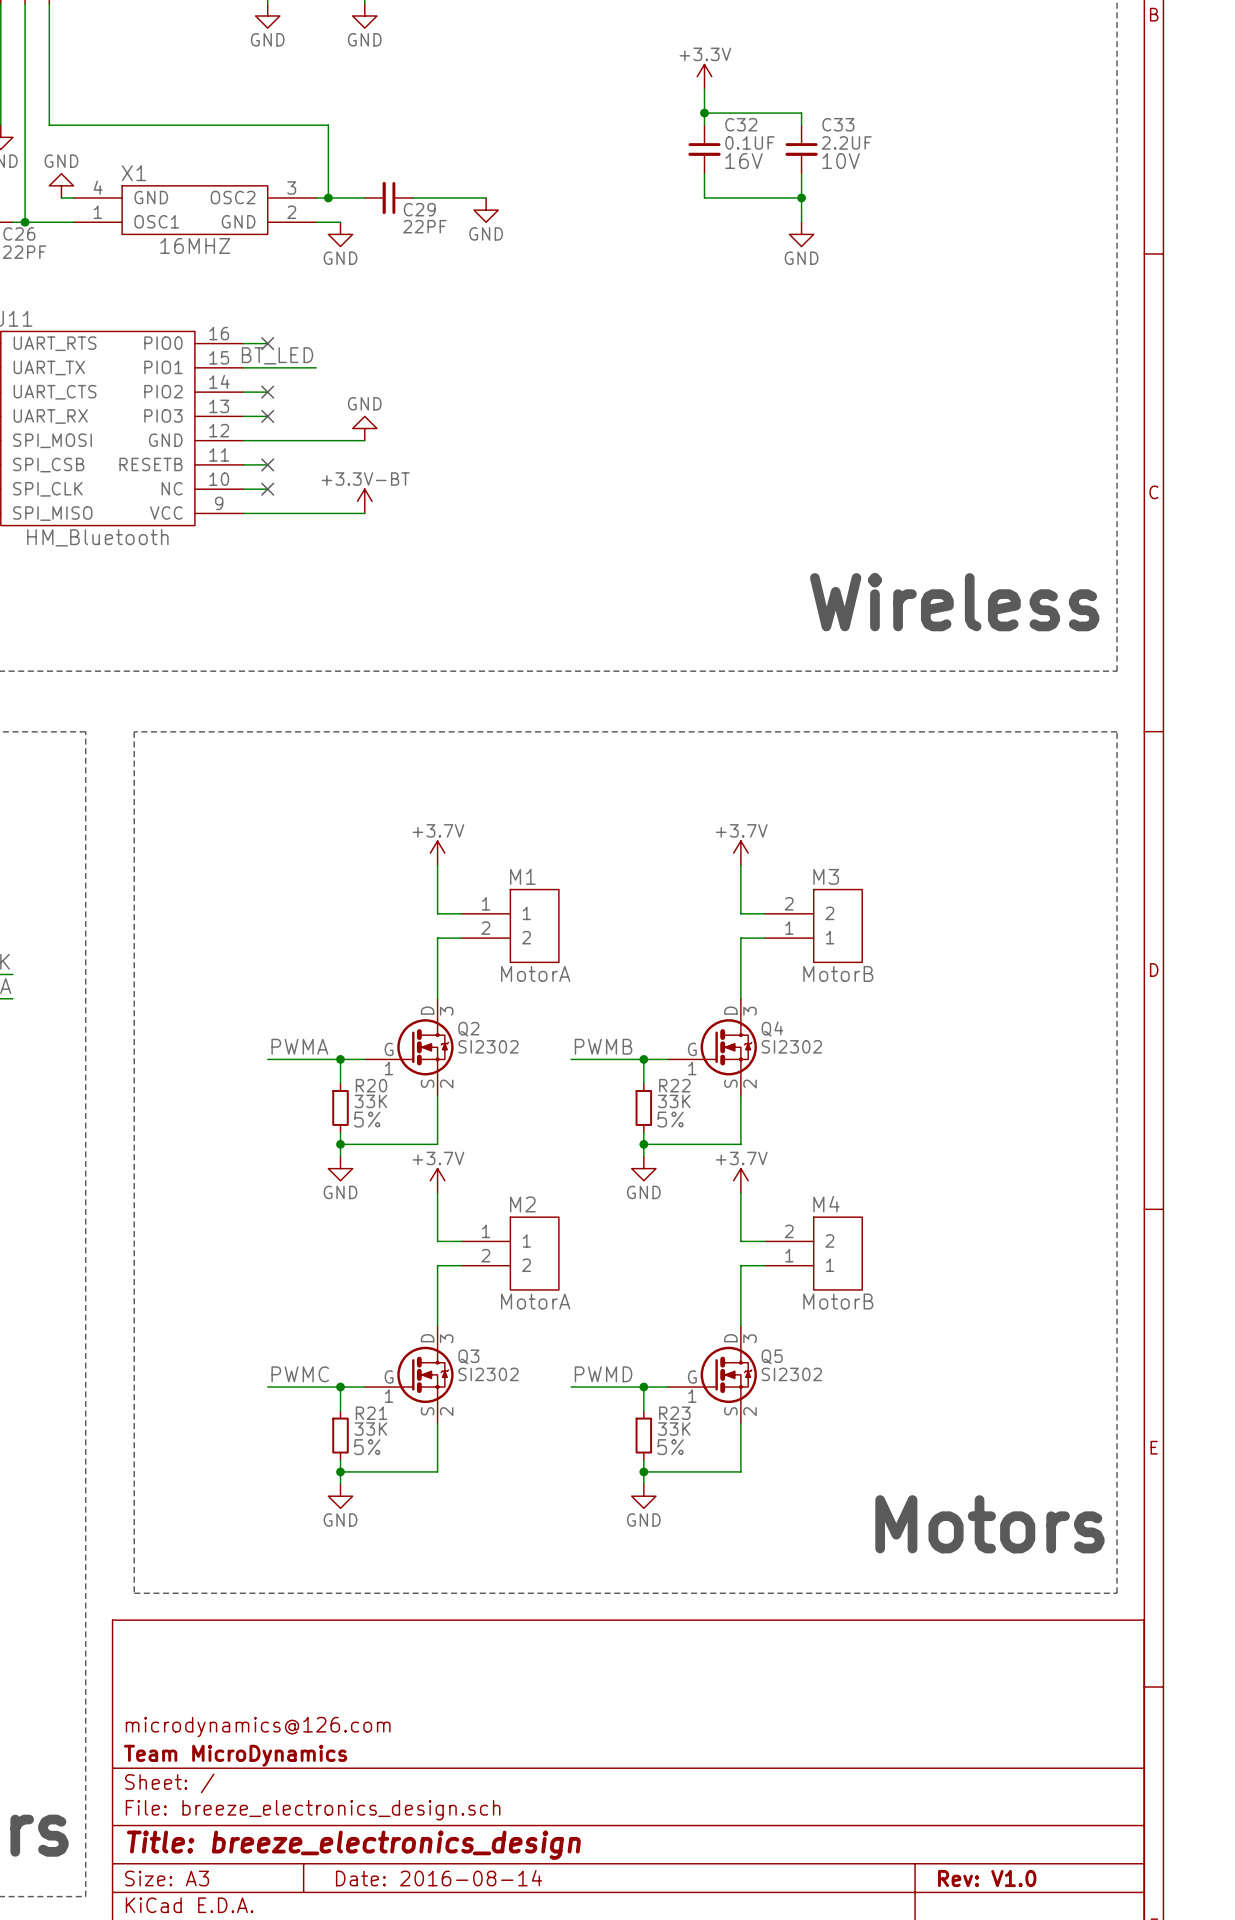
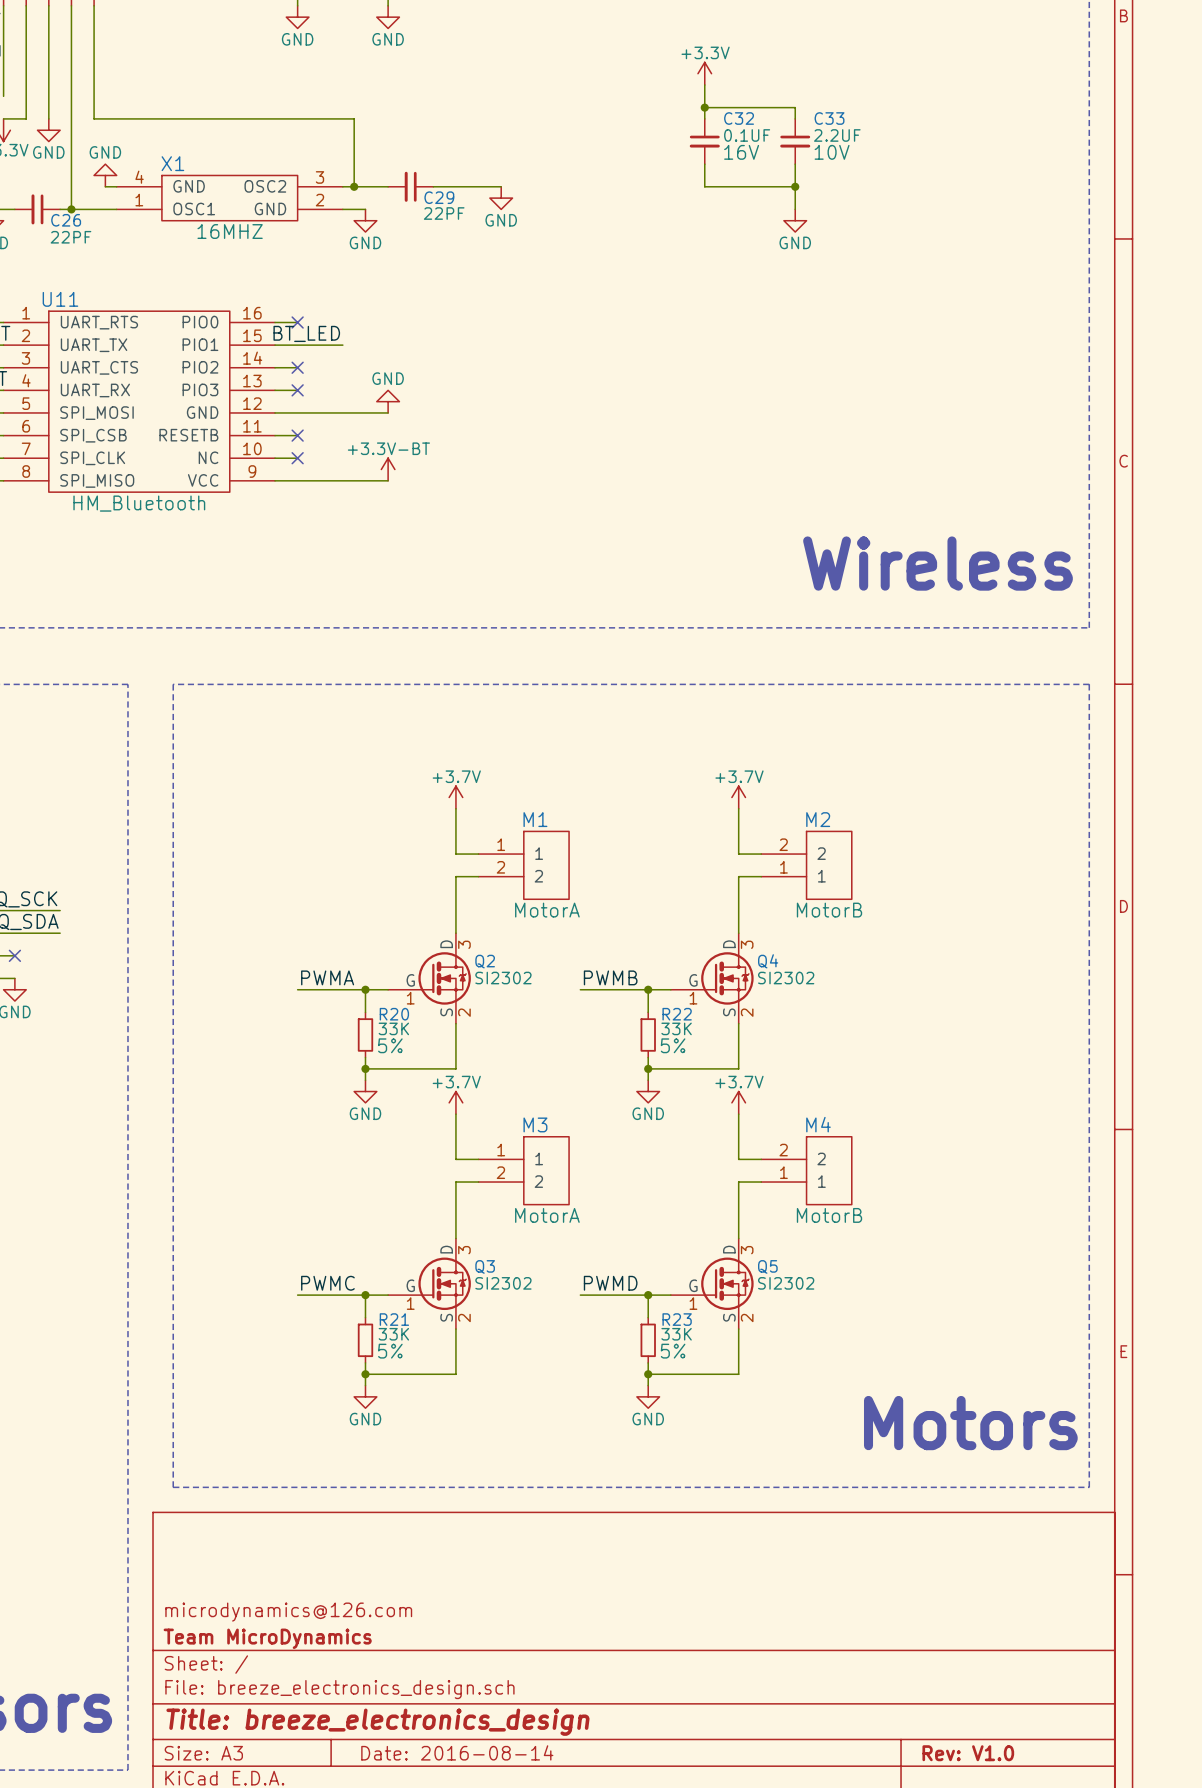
M3 name: M3 (826, 876) -> M2 (818, 819)
M2 name: M2 (522, 1204) -> M3 (535, 1124)

